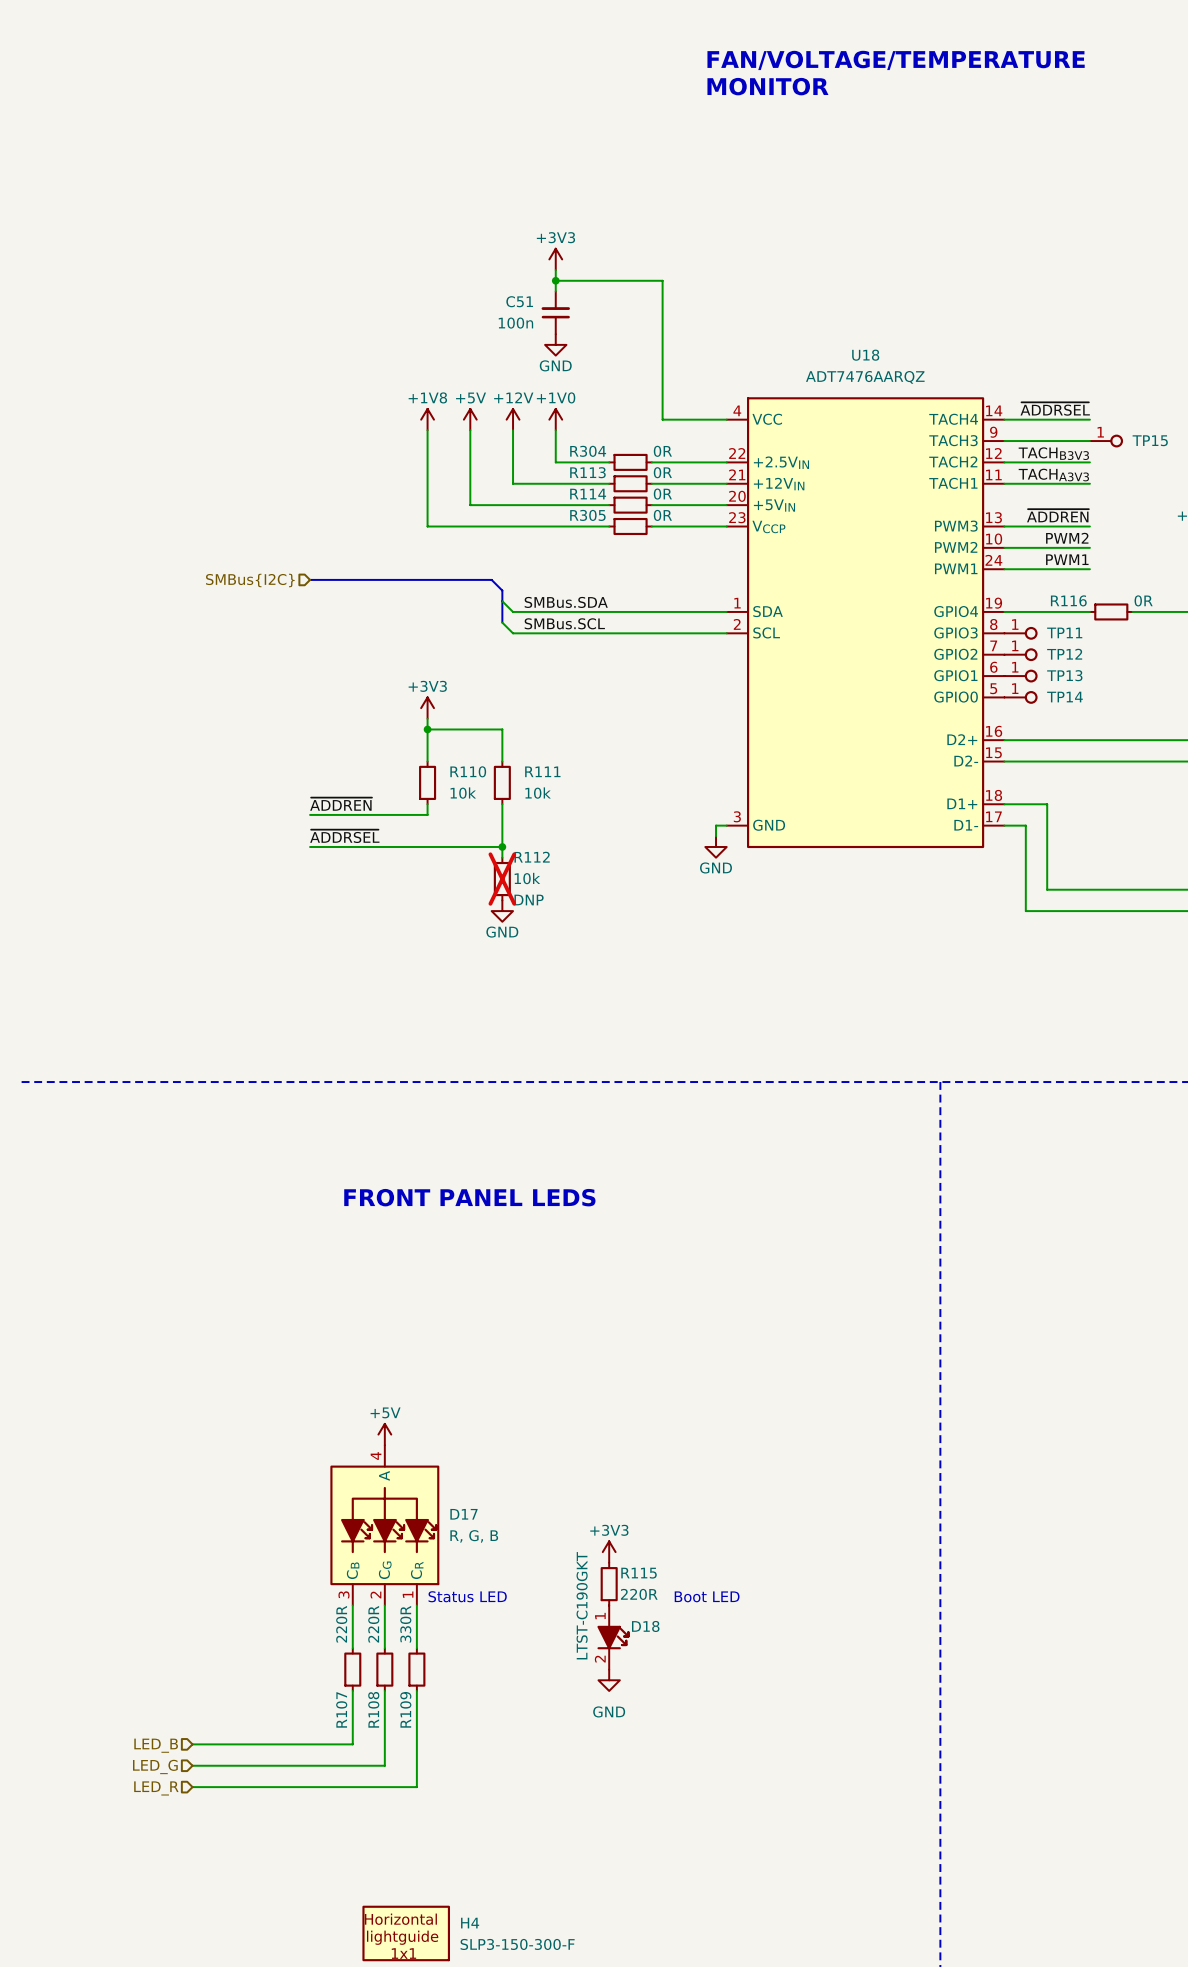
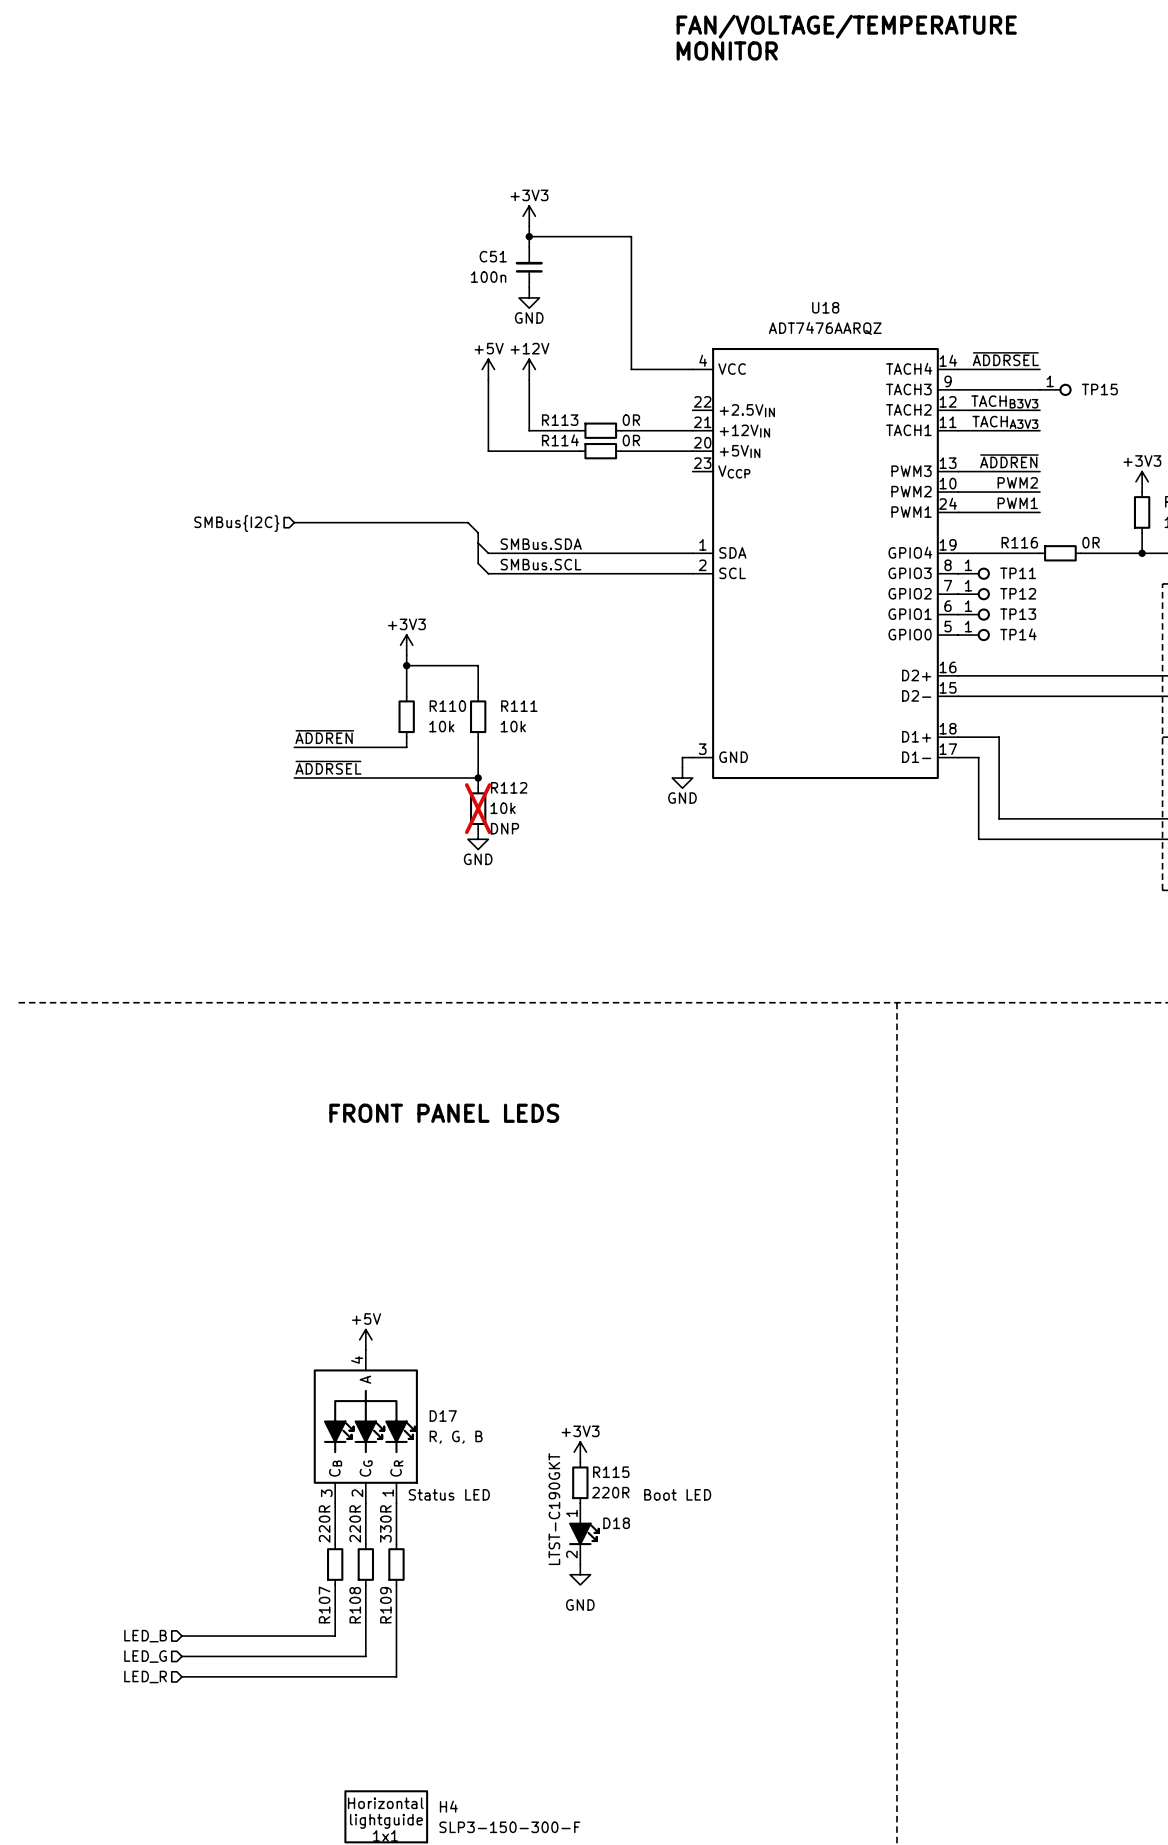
power symbol: +1V8 (427, 419) -> none
power symbol: +5V (470, 419) -> none
power symbol: +12V (513, 419) -> +5V (488, 369)
power symbol: +1V0 (555, 419) -> +12V (529, 369)
wire: (427, 430) (427, 526) (609, 526) -> none
wire: (470, 430) (470, 505) (513, 505) -> (488, 430) (488, 451)
wire: (555, 462) (609, 462) -> none
R304: (630, 462) -> none
wire: (651, 462) (726, 462) -> none
wire: (513, 483) (555, 483) -> (529, 410) (529, 430)
R305: (630, 526) -> none
wire: (651, 526) (726, 526) -> none

